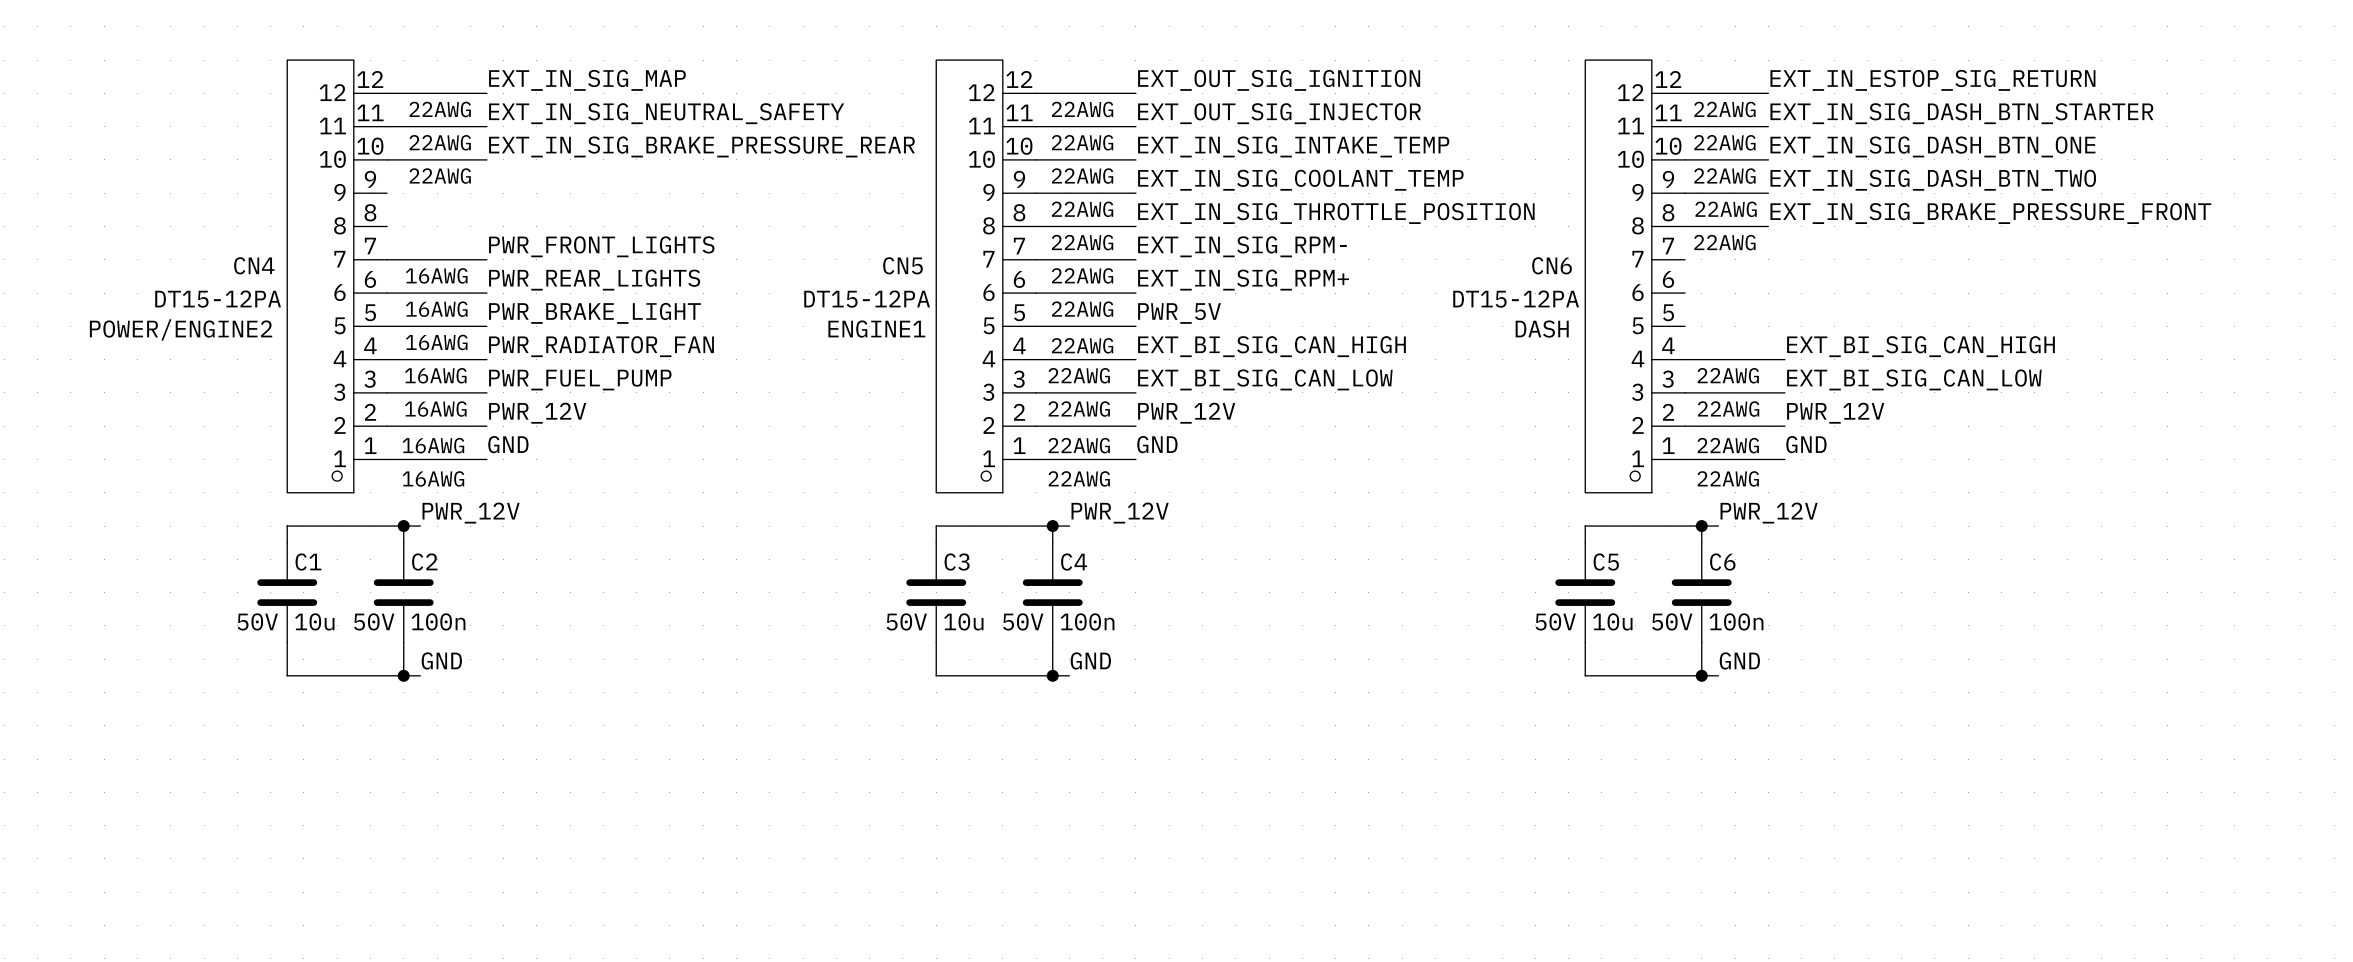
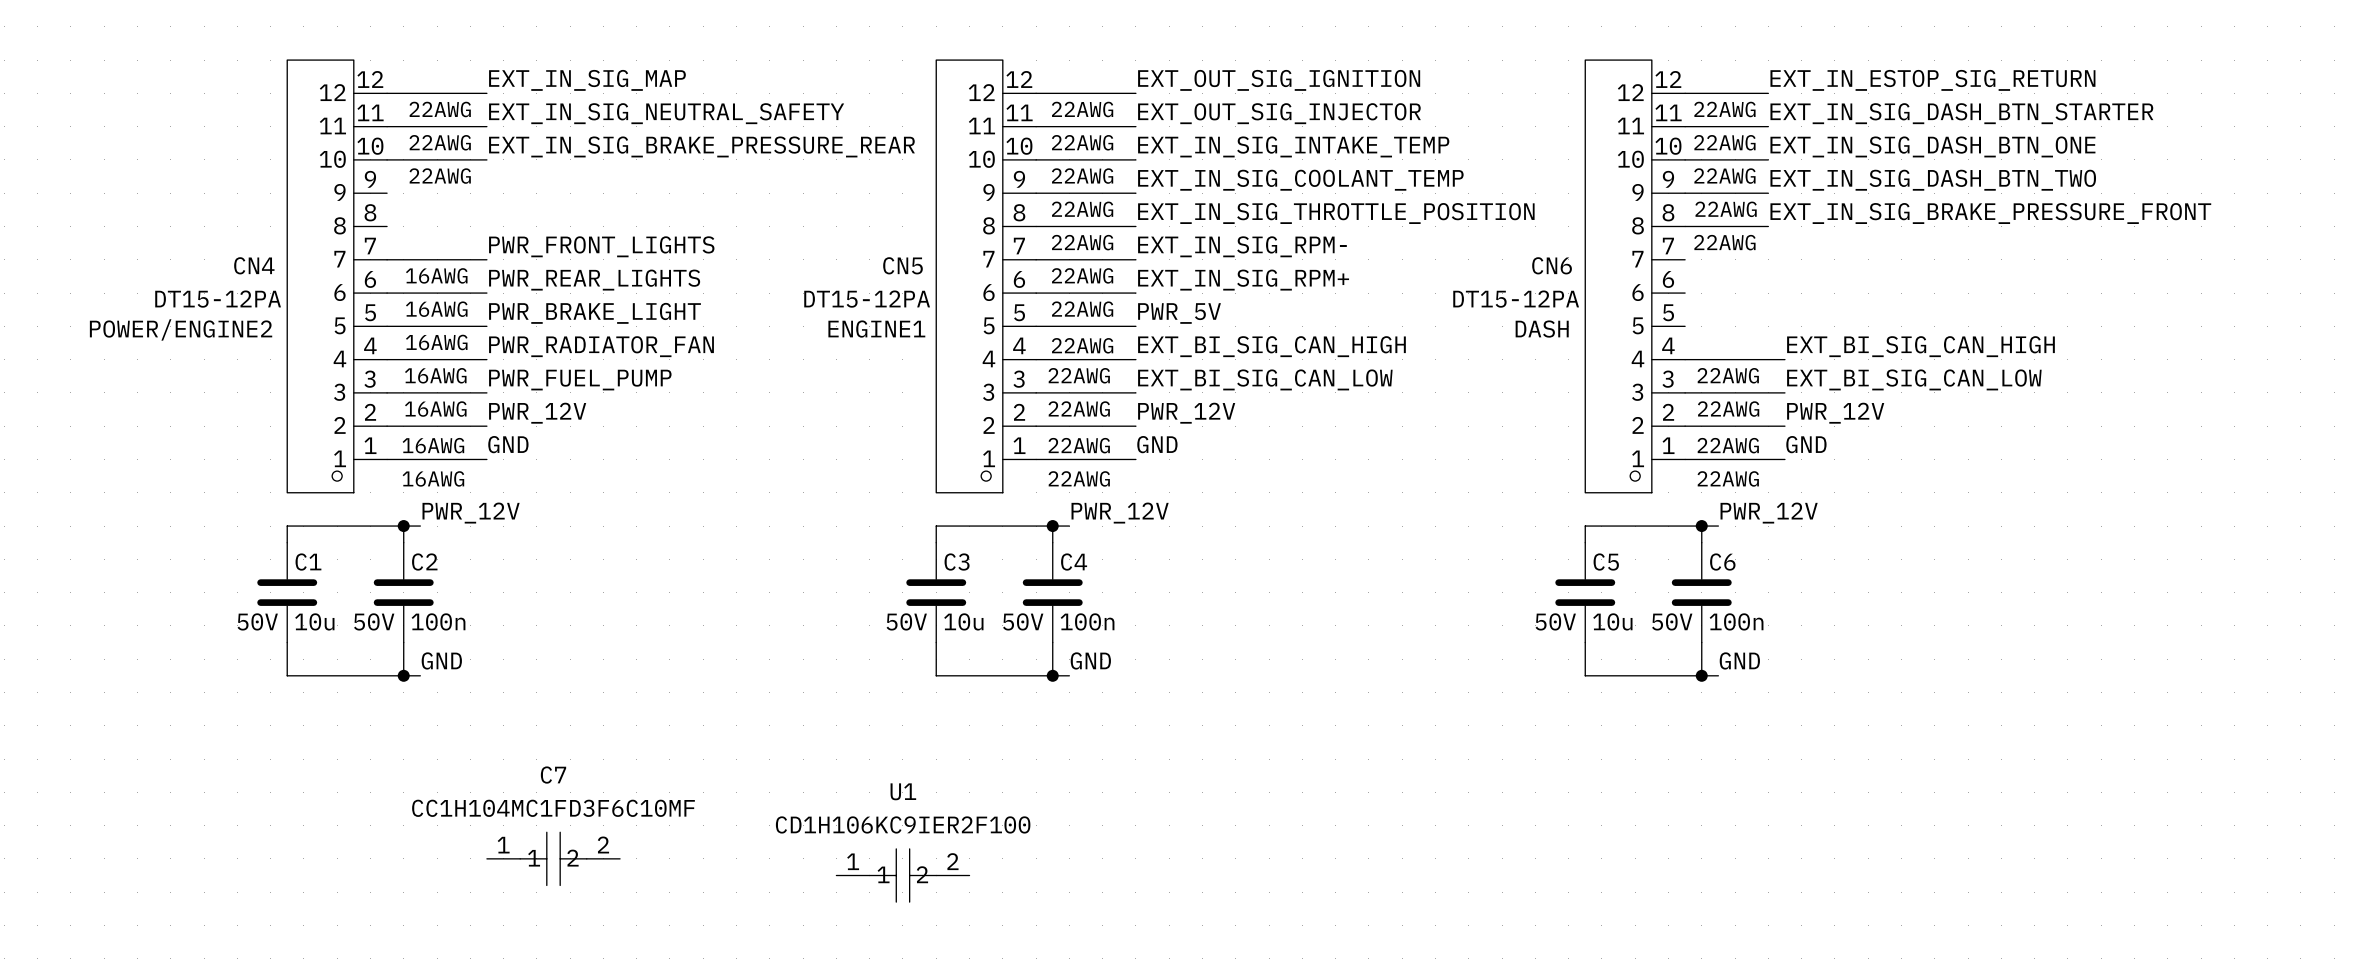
C7: none -> CC1H104MC1FD3F6C10MF (553, 858)
U1: none -> CD1H106KC9IER2F100 (902, 875)

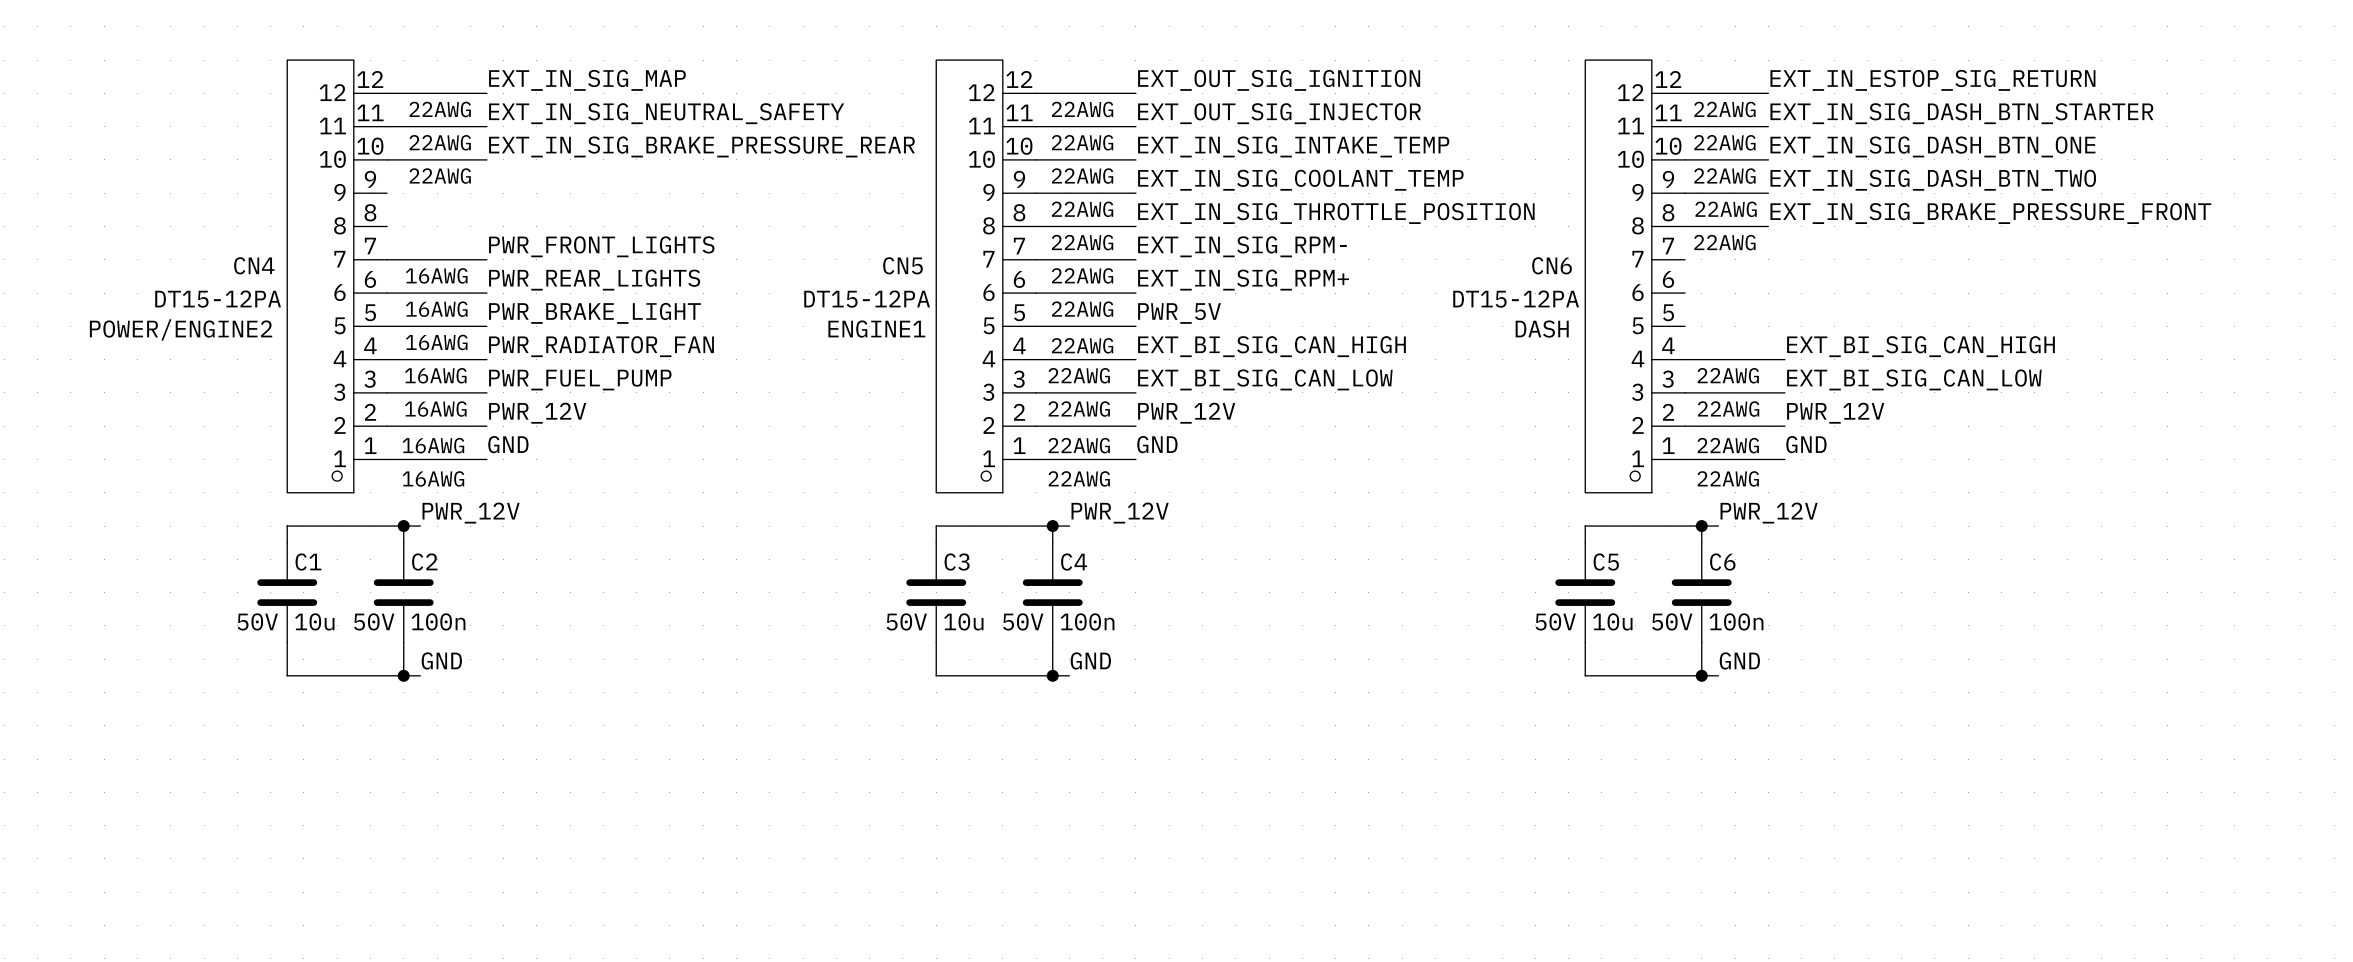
C7: CC1H104MC1FD3F6C10MF (553, 858) -> none
U1: CD1H106KC9IER2F100 (902, 875) -> none

